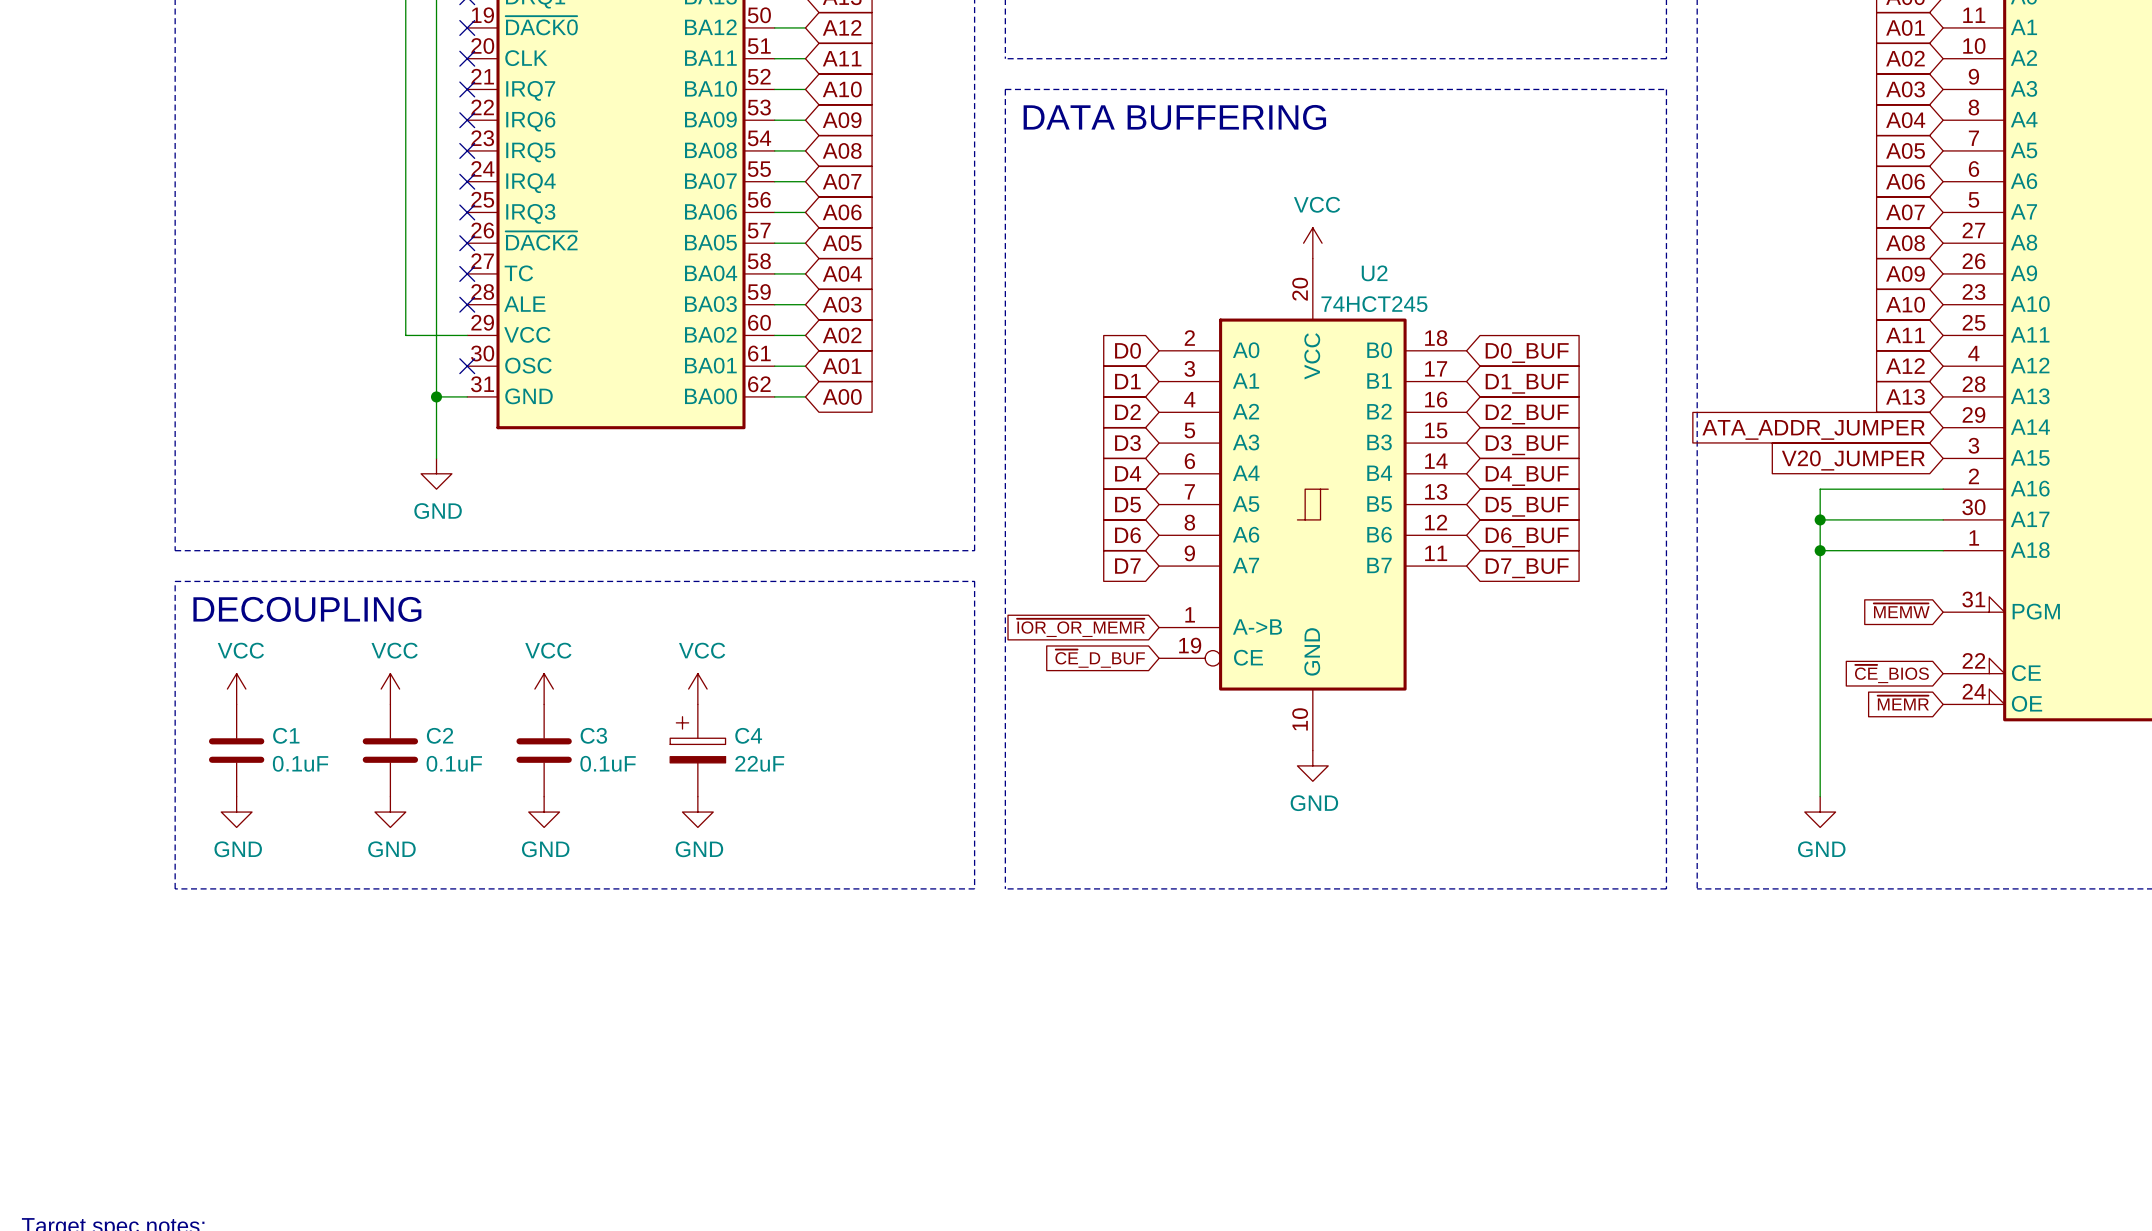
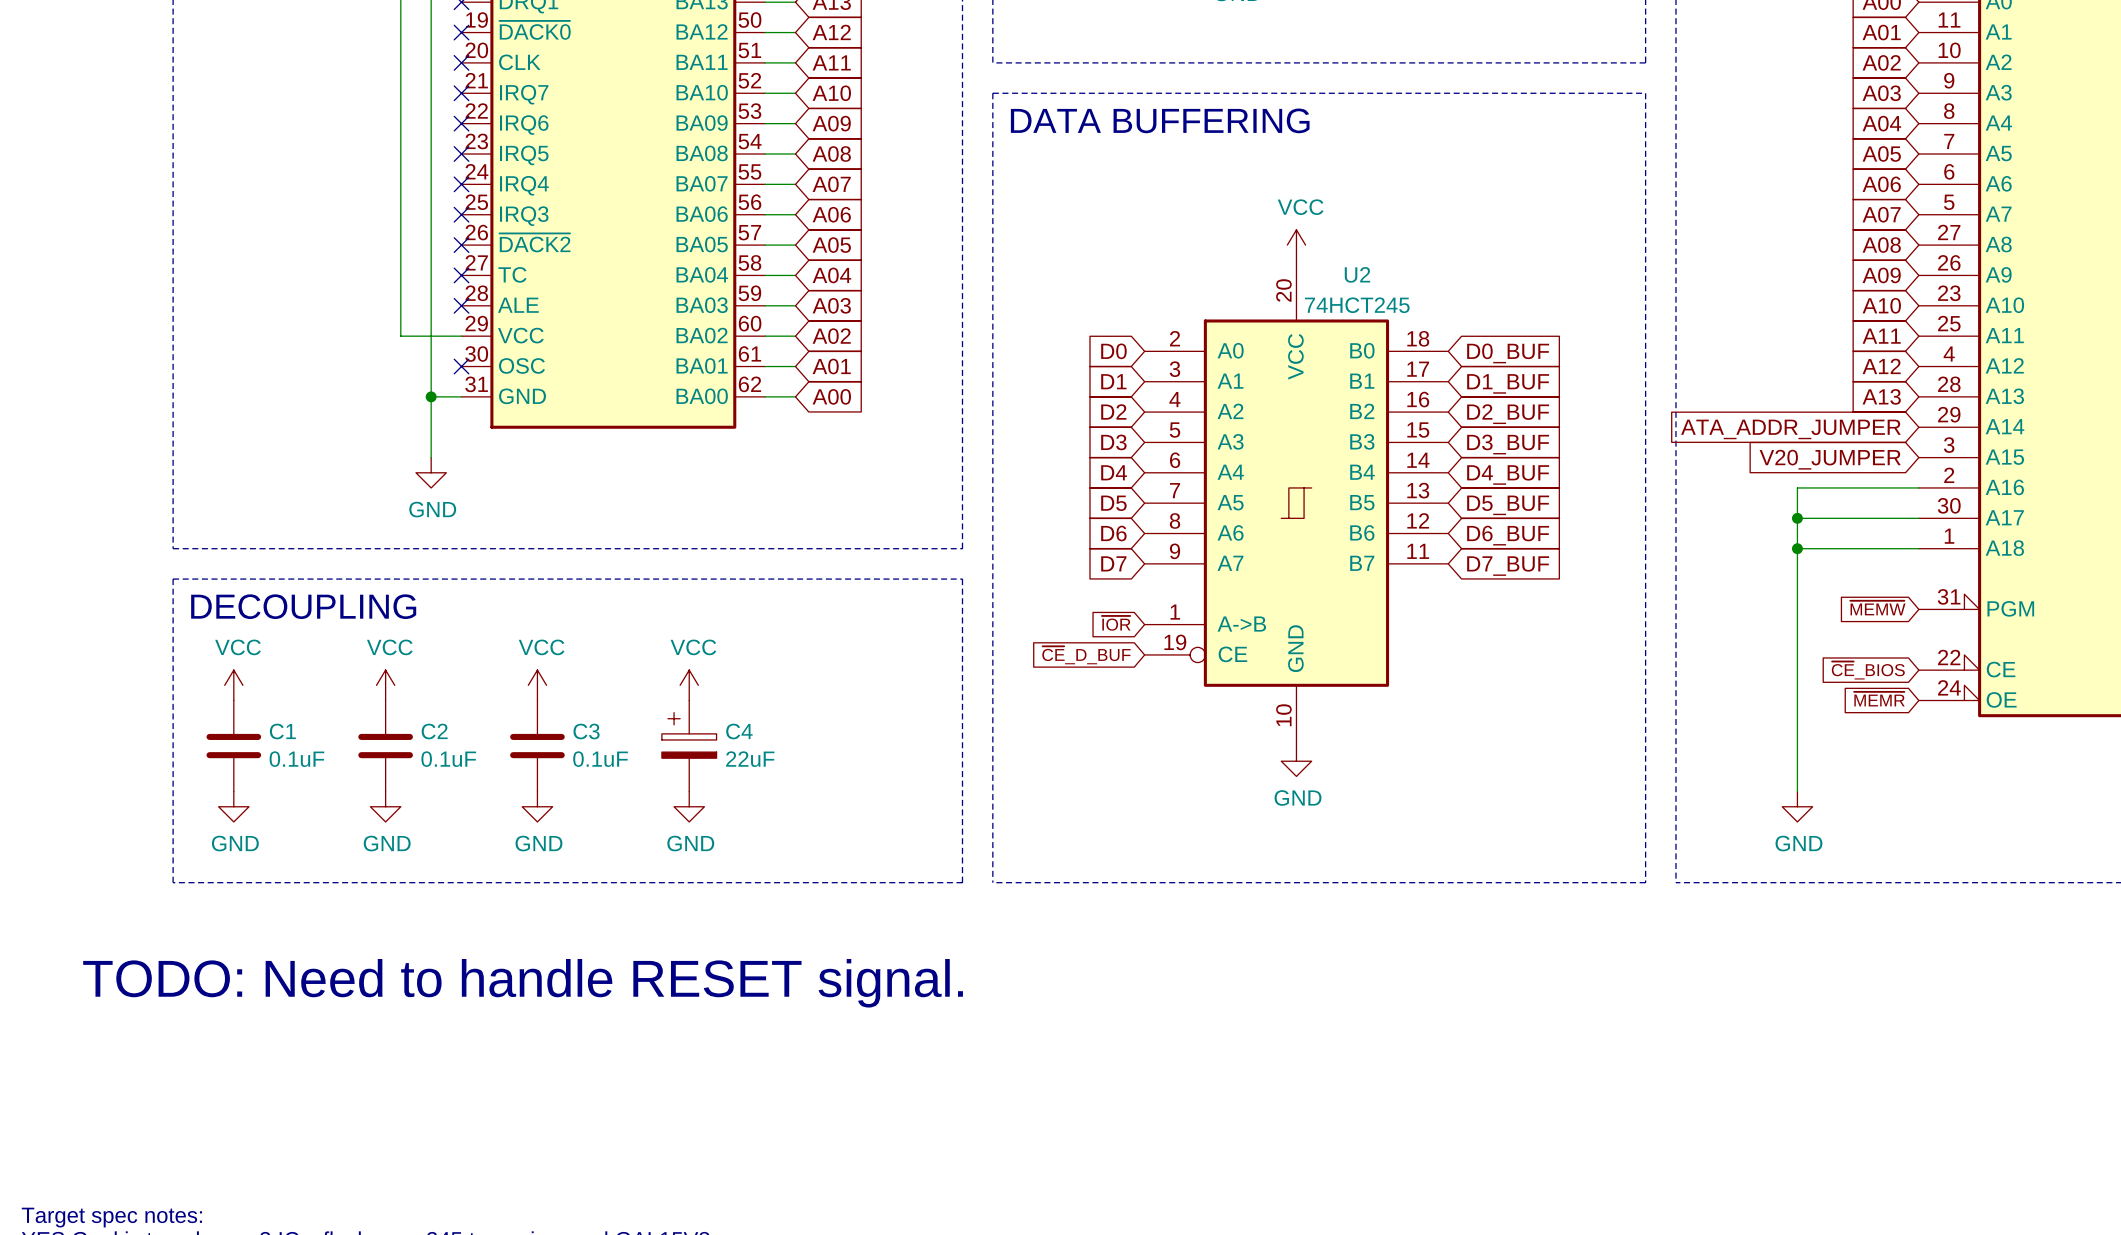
global label: ~{IOR_OR_MEMR} (1080, 627) -> ~{IOR} (1116, 623)
text: none -> TODO: Need to handle RESET signal. (523, 983)

